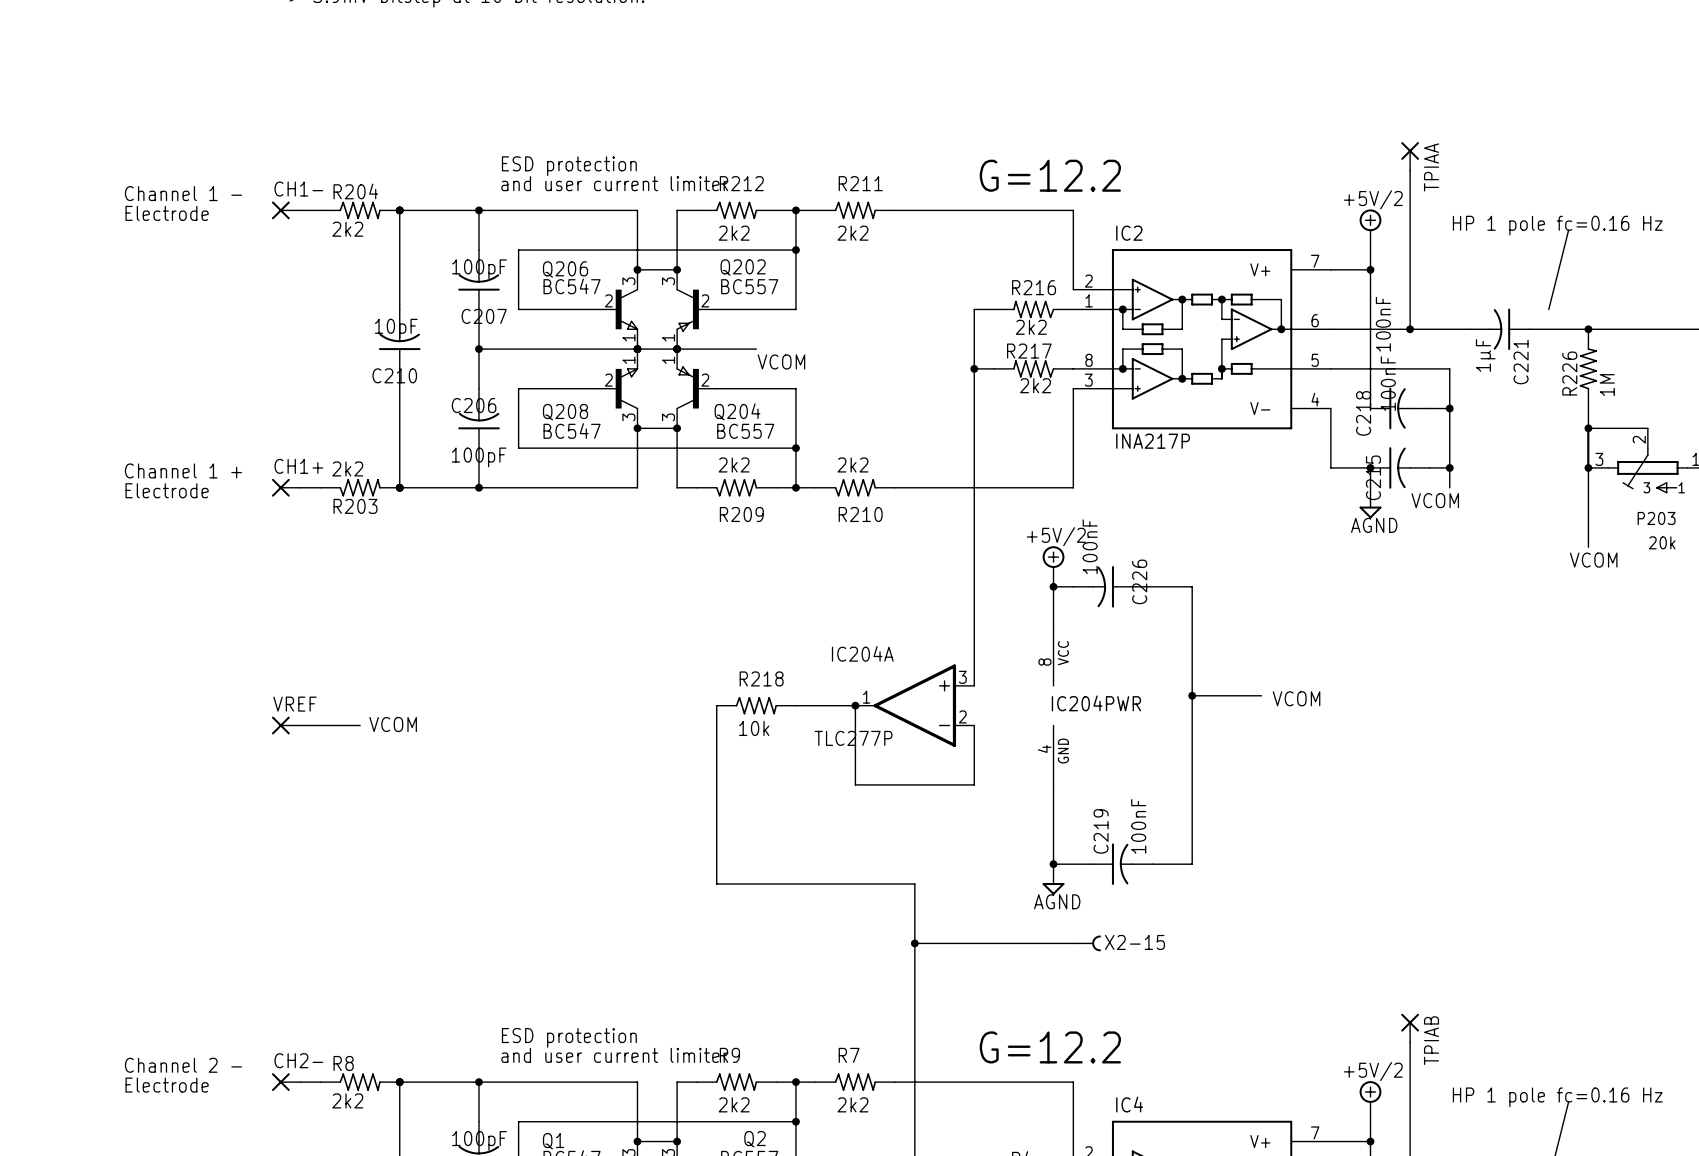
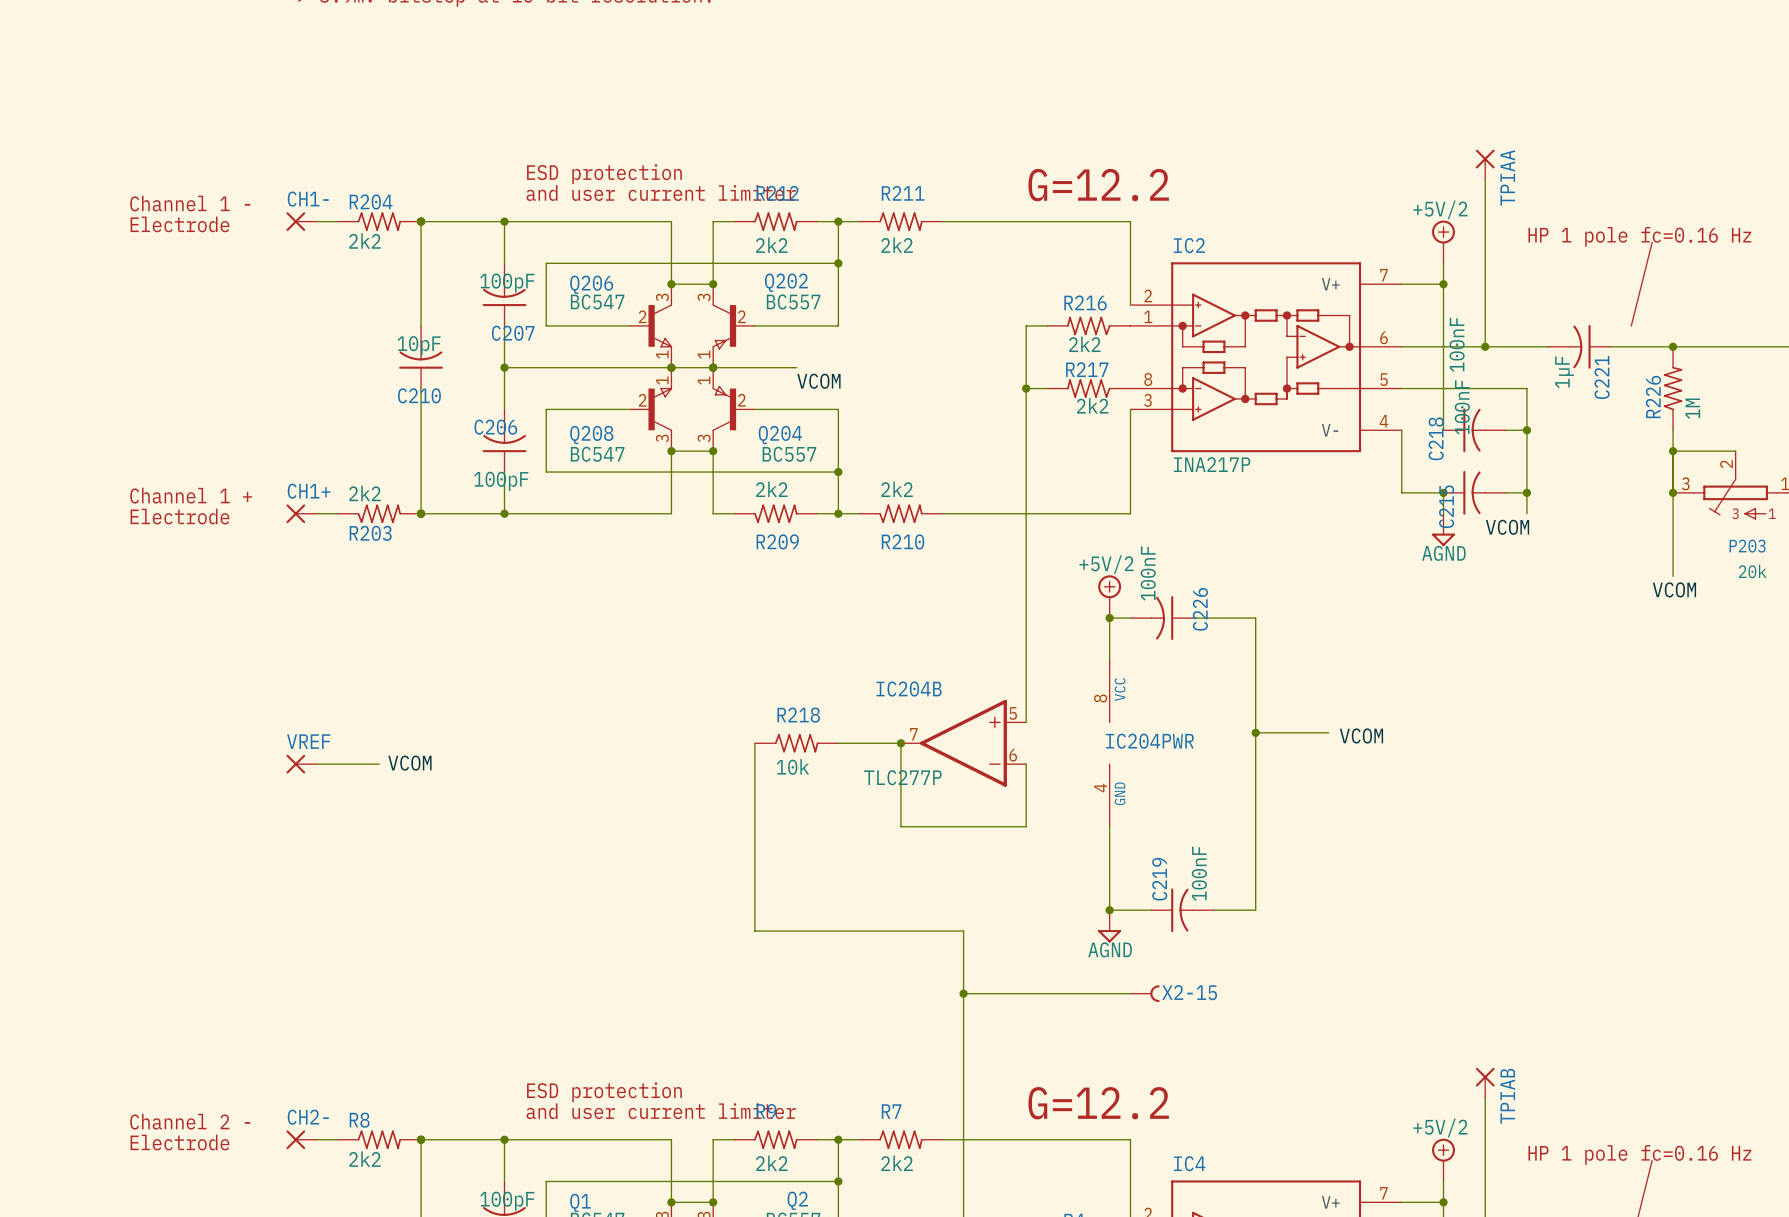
IC204A name: IC204A (862, 653) -> IC204B (909, 689)
IC204A pin number: 3 (962, 677) -> 5 (1013, 713)
IC204A pin number: 1 (866, 697) -> 7 (913, 734)
IC204A pin number: 2 (962, 716) -> 6 (1013, 755)

